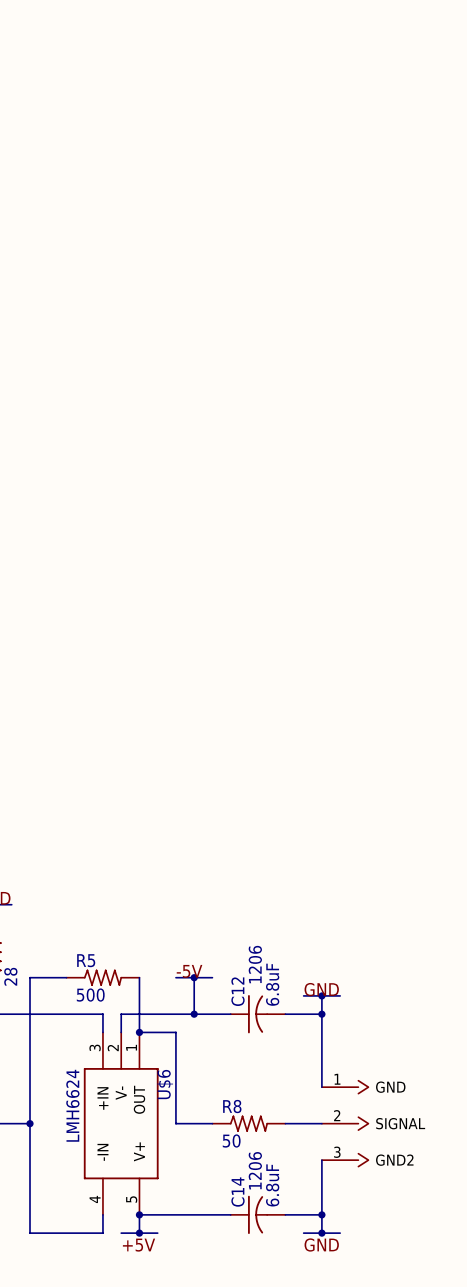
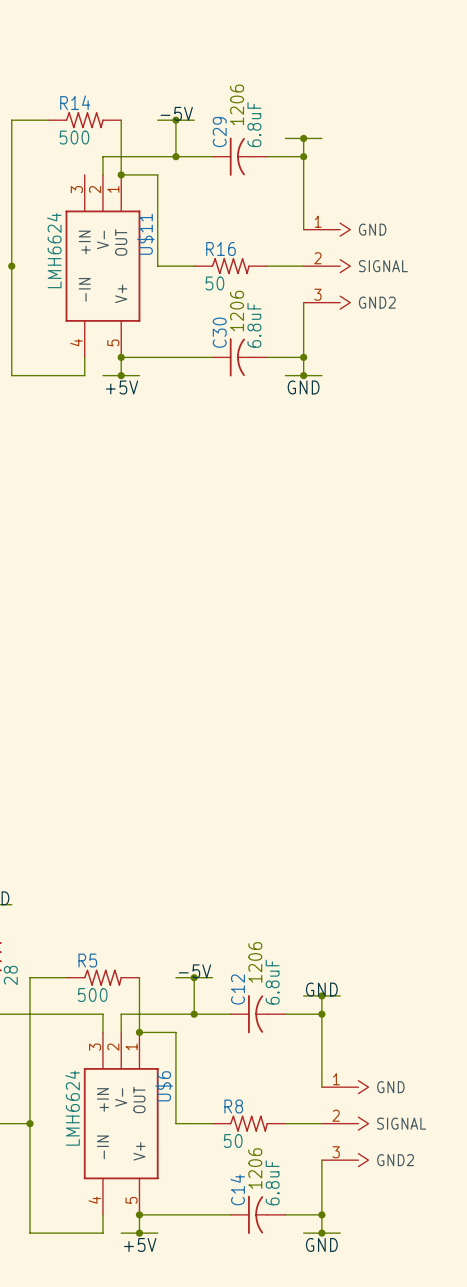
text: none -> 1206 (237, 104)
label: none -> -5V (176, 113)
wire: none -> (48, 120) (11, 120) (11, 375) (84, 375) (84, 357)
R14: none -> 500 (84, 120)
wire: none -> (121, 120) (121, 174) (157, 174) (157, 266) (194, 266)
wire: none -> (157, 120) (194, 120)
wire: none -> (175, 120) (175, 156)
junction: none -> (175, 120)
wire: none -> (285, 138) (321, 138)
wire: none -> (303, 138) (303, 229)
junction: none -> (303, 138)
junction: none -> (175, 156)
wire: none -> (212, 156) (102, 156) (102, 174)
C29: none -> 6.8uF (239, 156)
wire: none -> (267, 156) (303, 156)
junction: none -> (303, 156)
junction: none -> (121, 174)
junction: none -> (11, 266)
U$11: none -> LMH6624 (102, 266)
R16: none -> 50 (230, 266)
wire: none -> (267, 266) (303, 266)
part: none -> (326, 266)
wire: none -> (303, 302) (303, 375)
text: none -> 1206 (237, 311)
junction: none -> (121, 357)
wire: none -> (212, 357) (121, 357) (121, 375)
C30: none -> 6.8uF (239, 357)
wire: none -> (267, 357) (303, 357)
junction: none -> (303, 357)
wire: none -> (102, 375) (139, 375)
junction: none -> (121, 375)
wire: none -> (285, 375) (321, 375)
junction: none -> (303, 375)
label: none -> +5V (121, 387)
label: none -> GND (303, 387)

